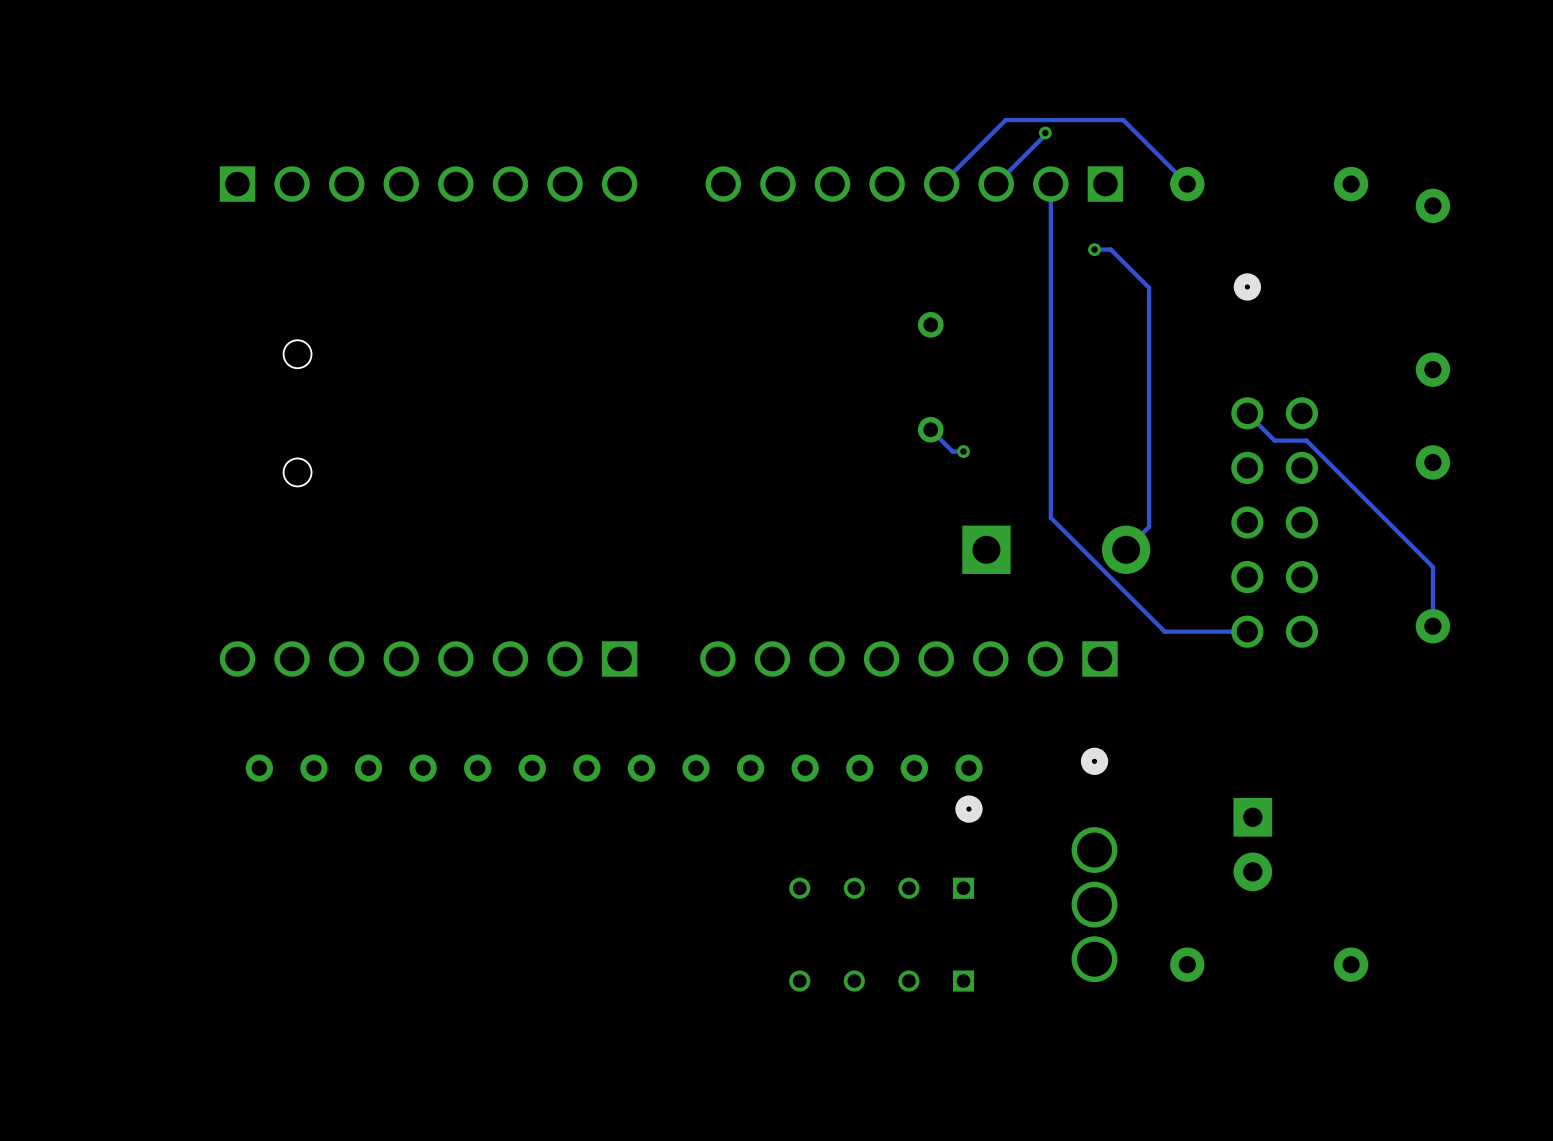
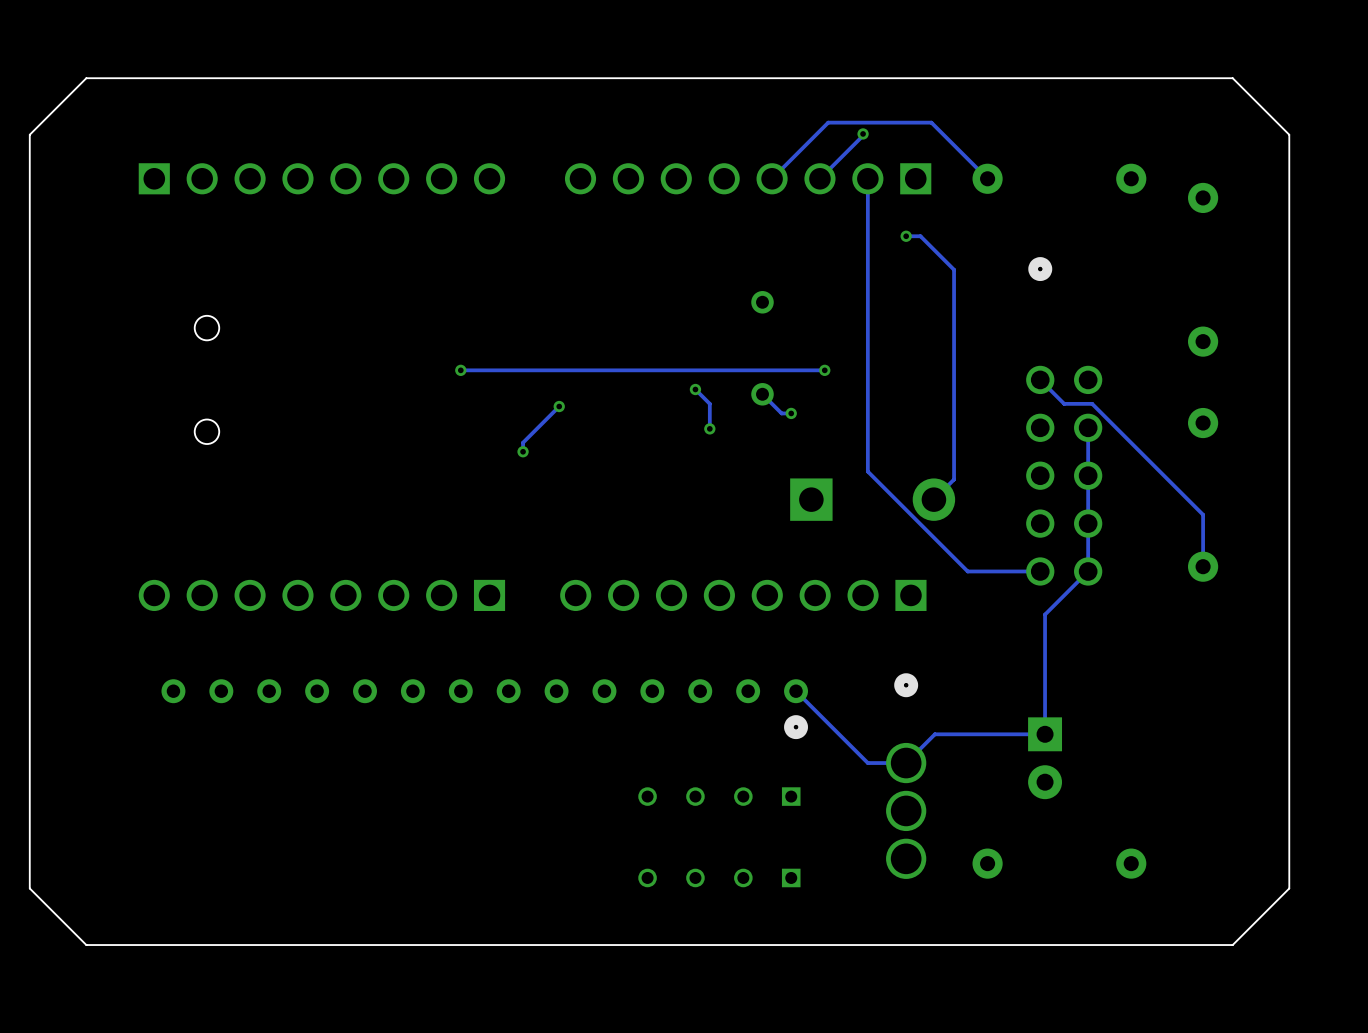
board edge: none -> (1232, 78) (1289, 134) (1289, 888) (1232, 945) (86, 945) (29, 888) (29, 134) (86, 78) (1232, 78)
via: none -> (460, 370)
track: none -> (824, 370) (460, 370)
via: none -> (824, 370)
track: none -> (695, 389) (709, 403) (709, 428)
via: none -> (695, 389)
track: none -> (559, 406) (523, 442) (523, 451)
via: none -> (559, 406)
track: none -> (1088, 427) (1088, 571) (1045, 614) (1045, 734) (934, 734) (906, 763) (867, 763) (796, 691)
via: none -> (709, 428)
via: none -> (523, 451)

